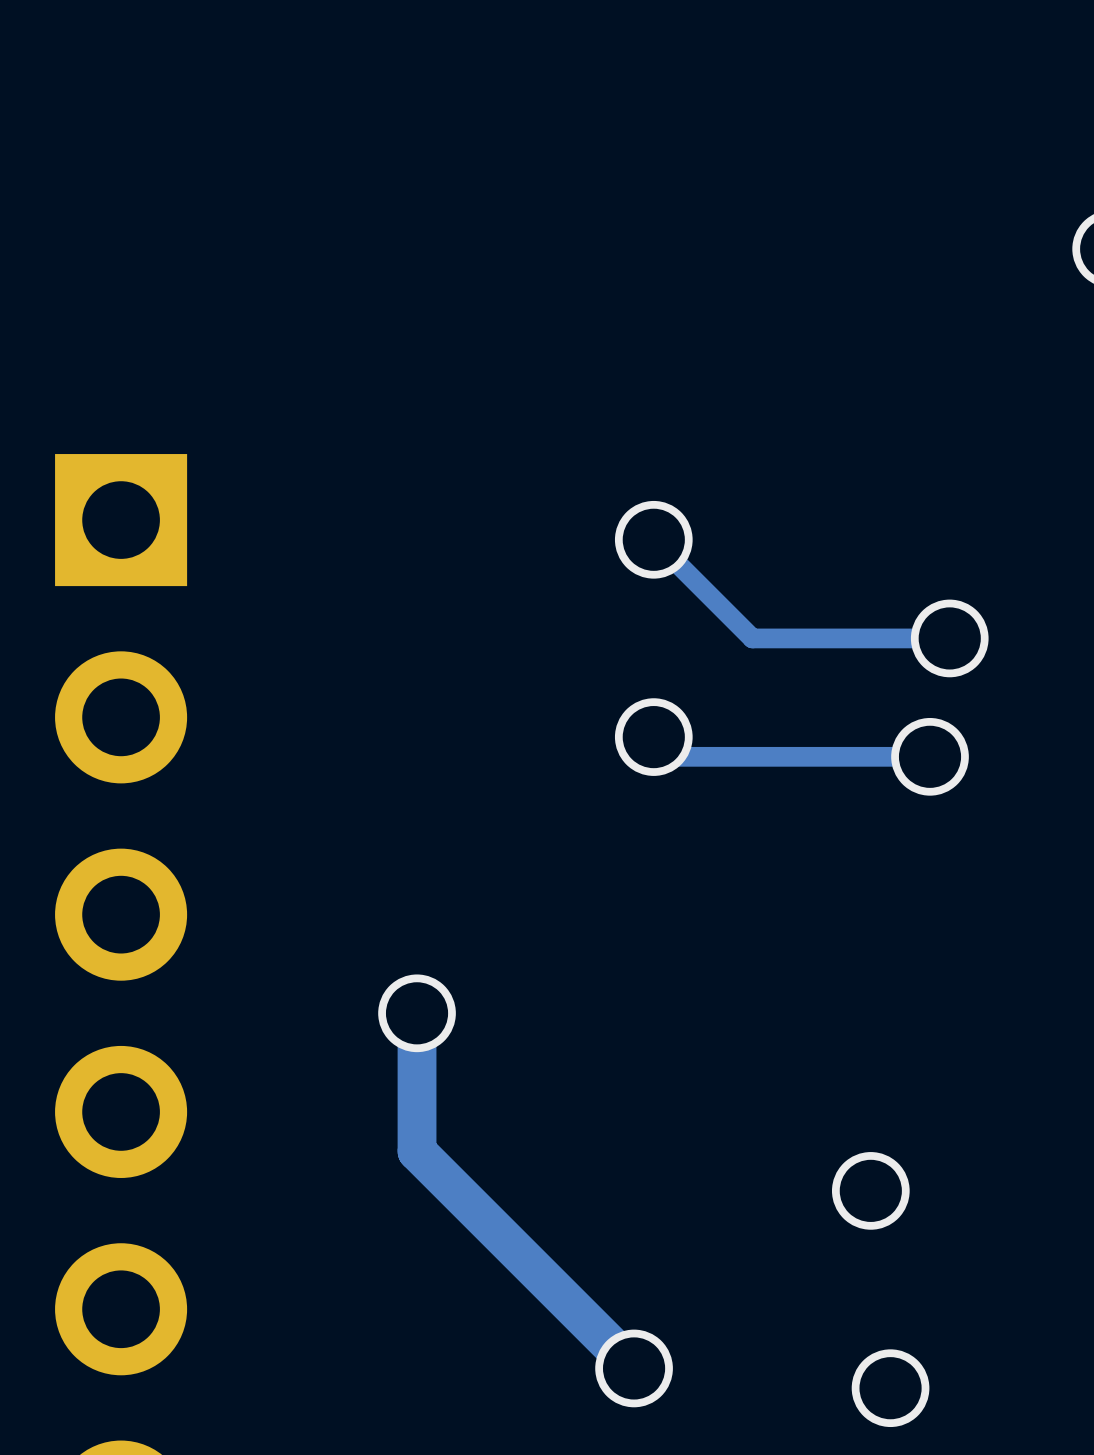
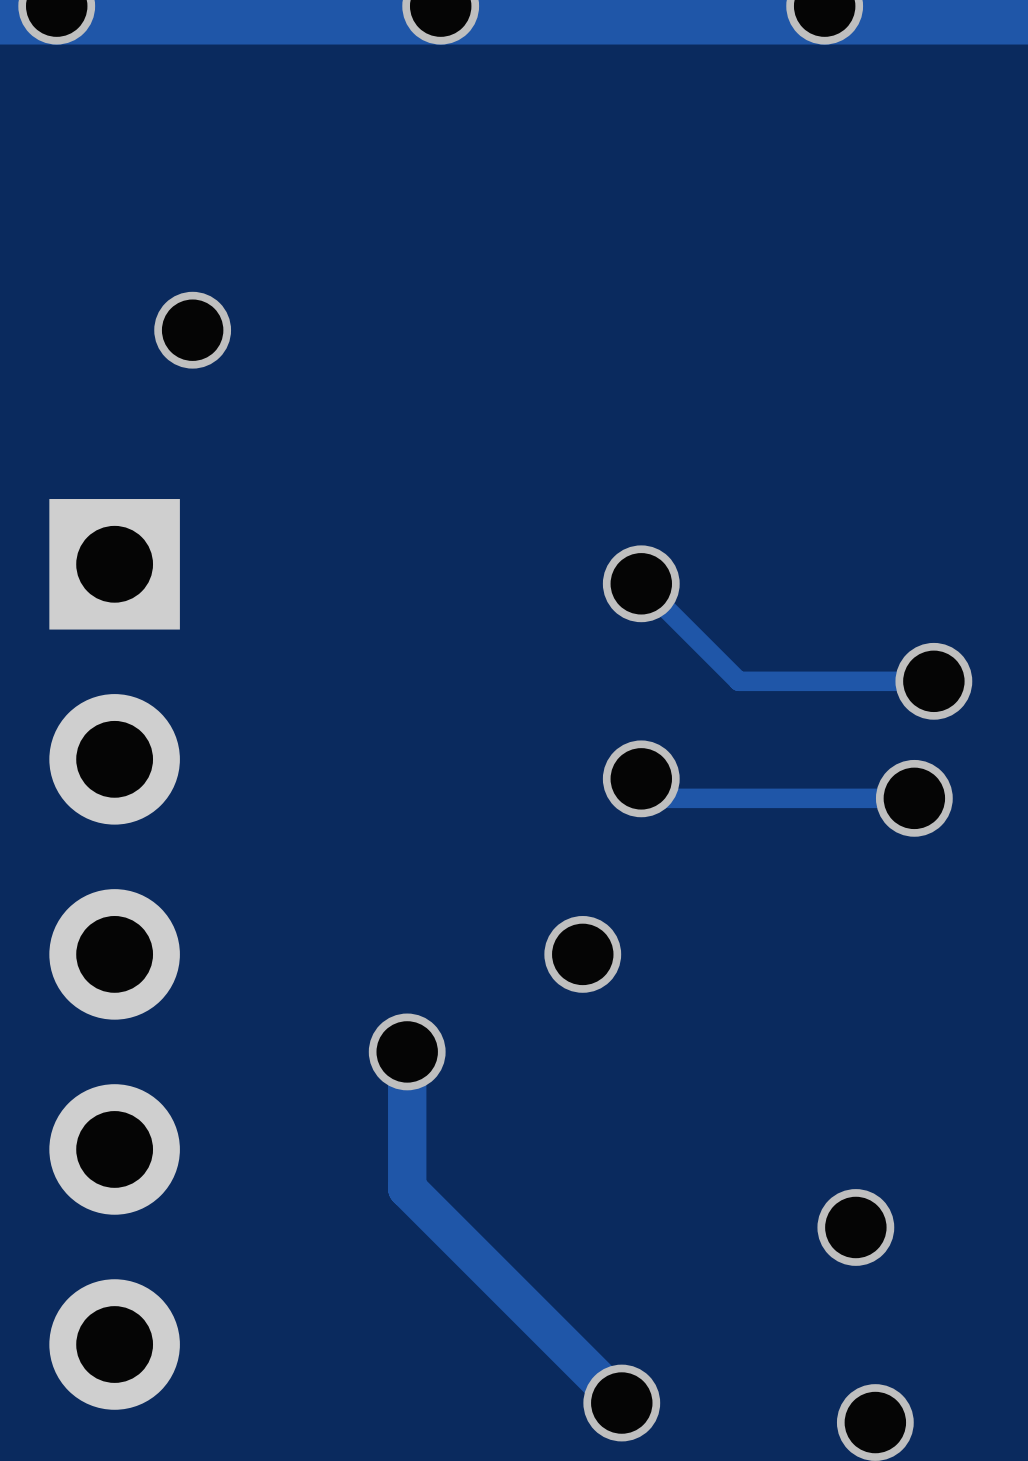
via: none -> (192, 330)
via: none -> (582, 954)

